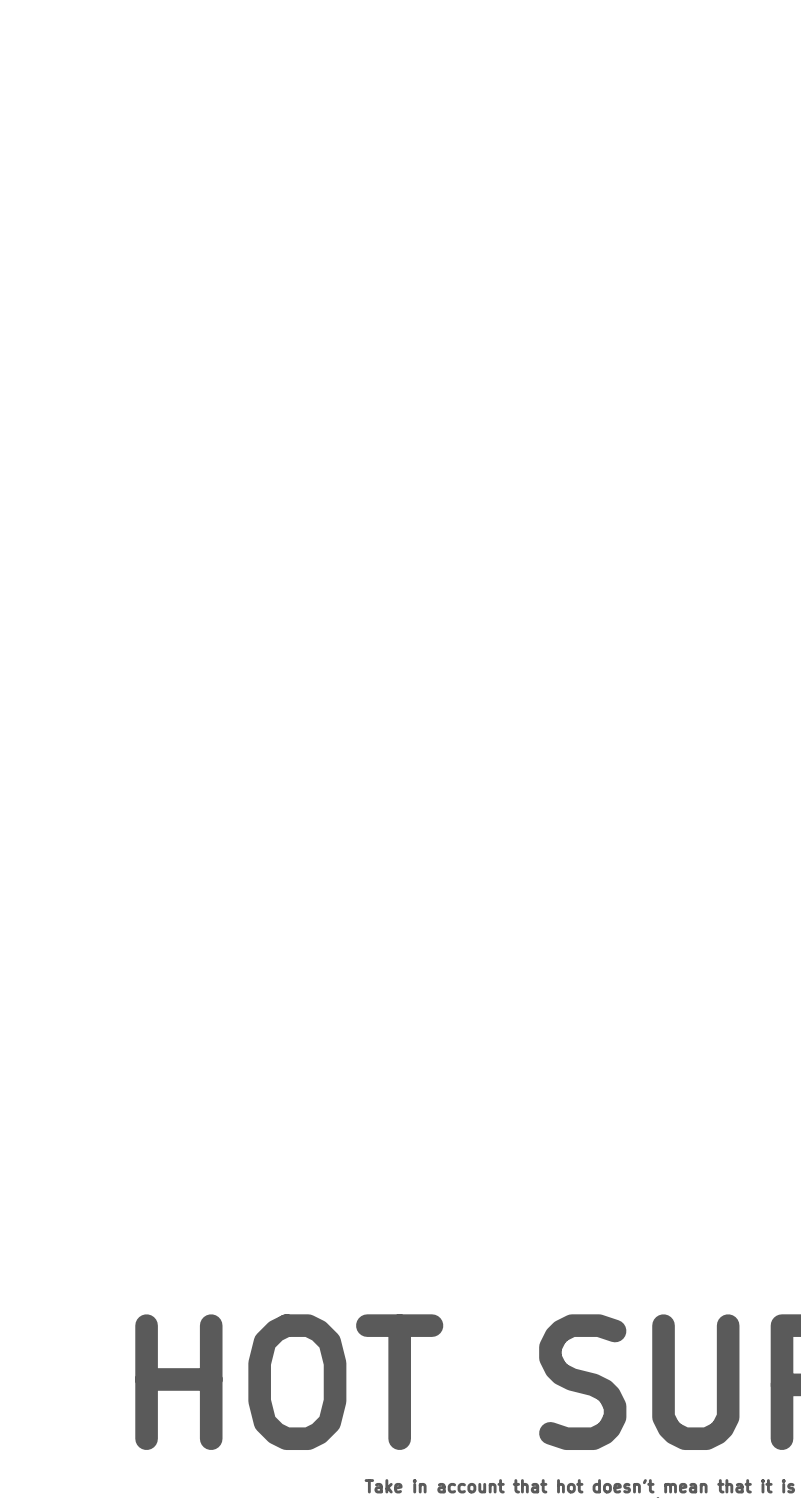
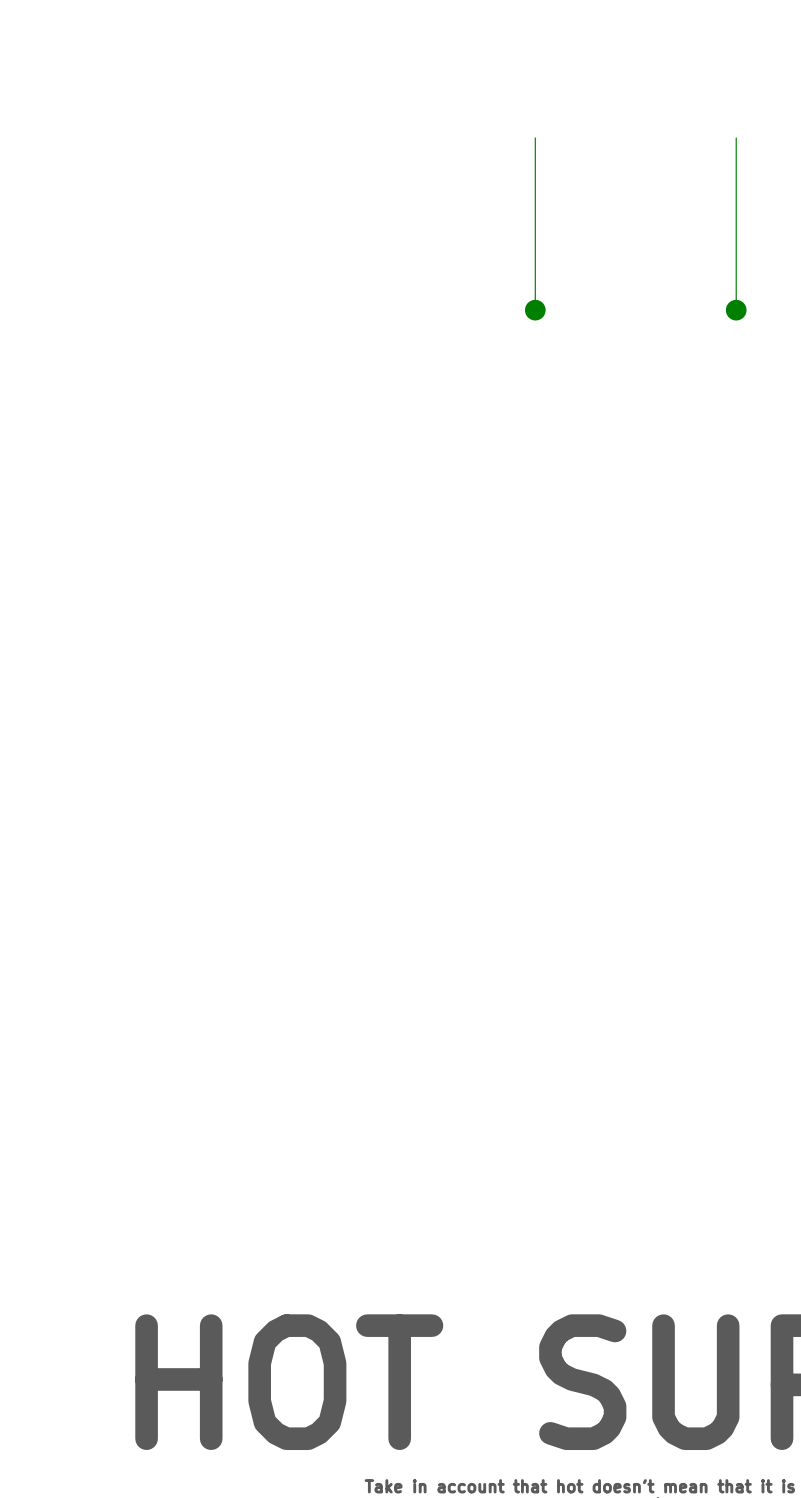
wire: none -> (535, 137) (535, 310)
wire: none -> (736, 137) (736, 310)
junction: none -> (535, 310)
junction: none -> (736, 310)

